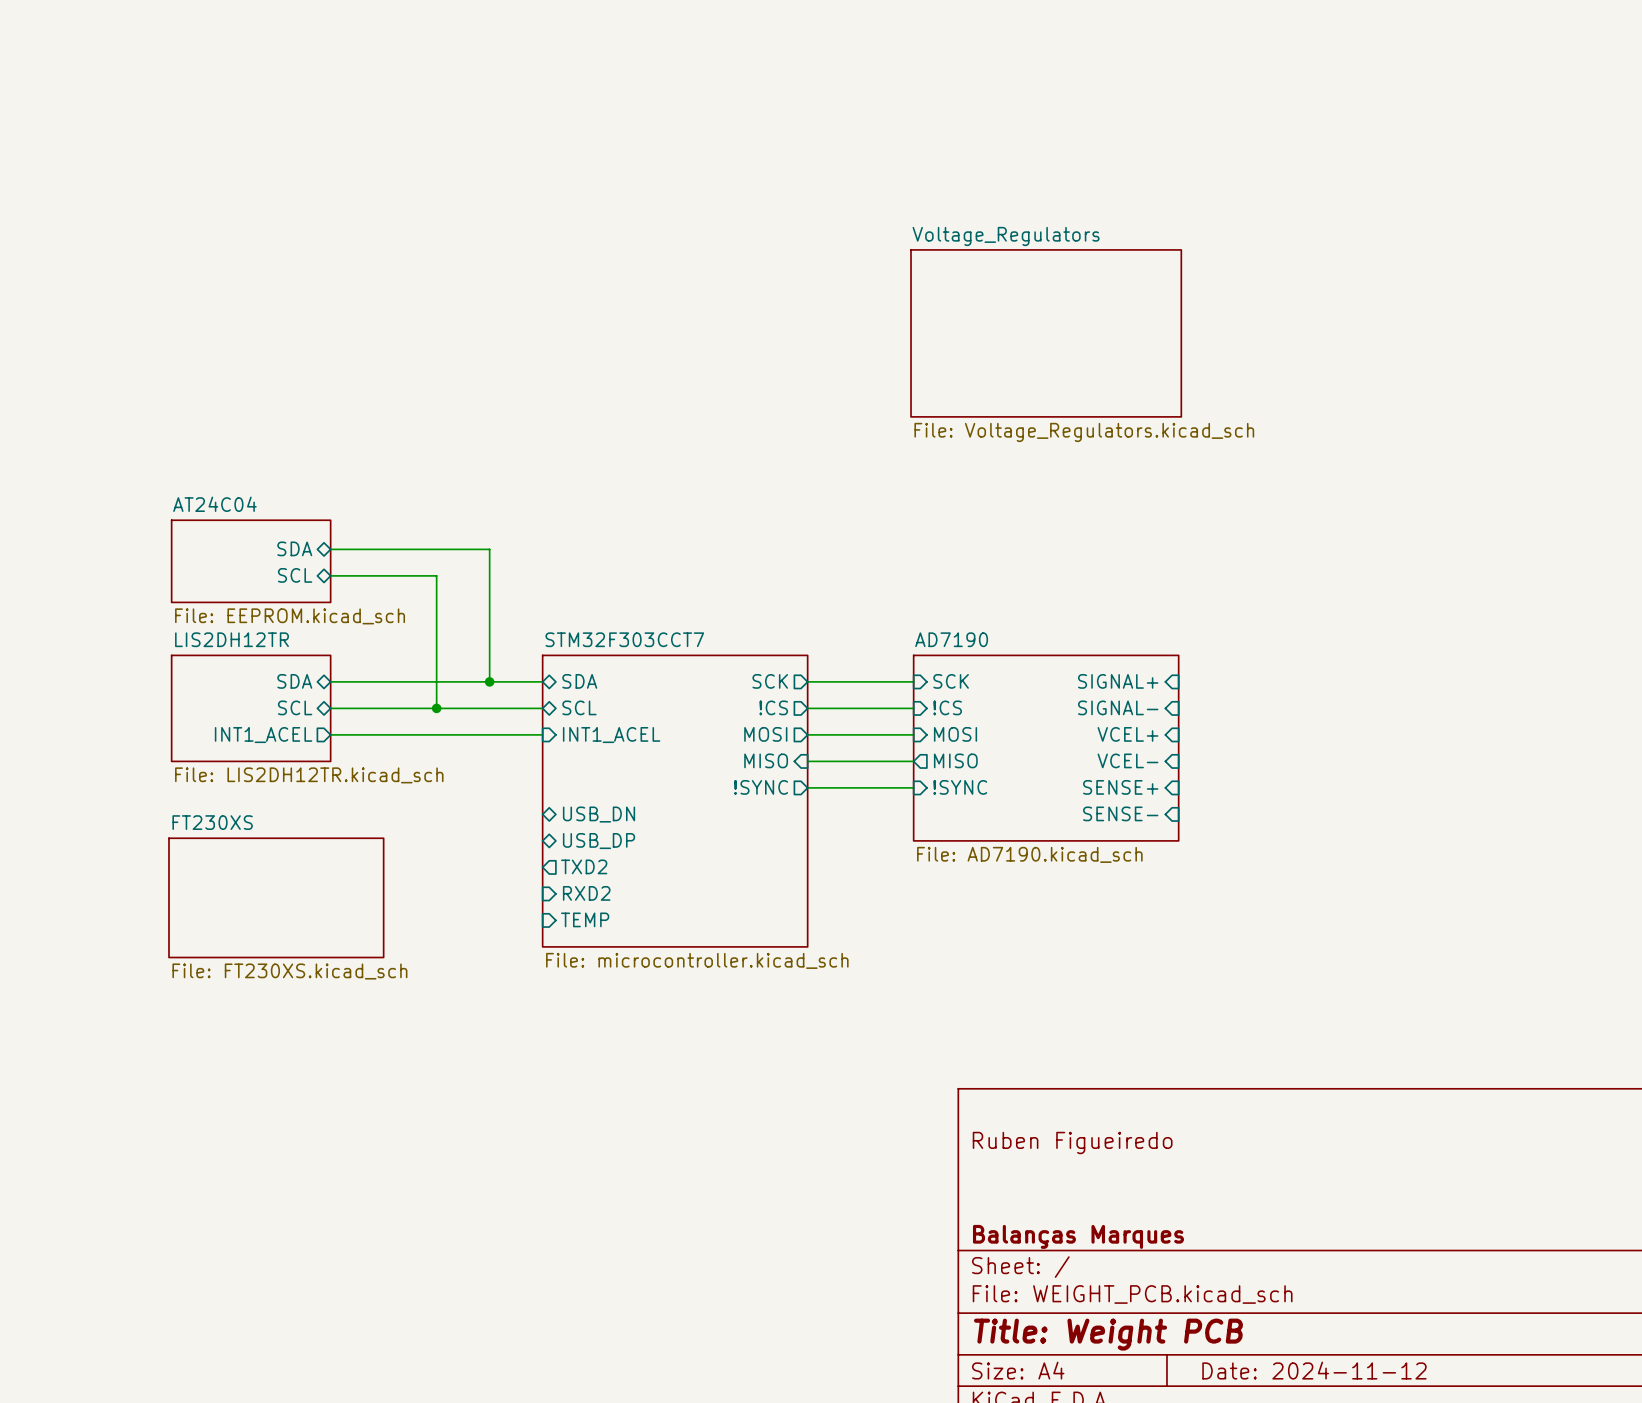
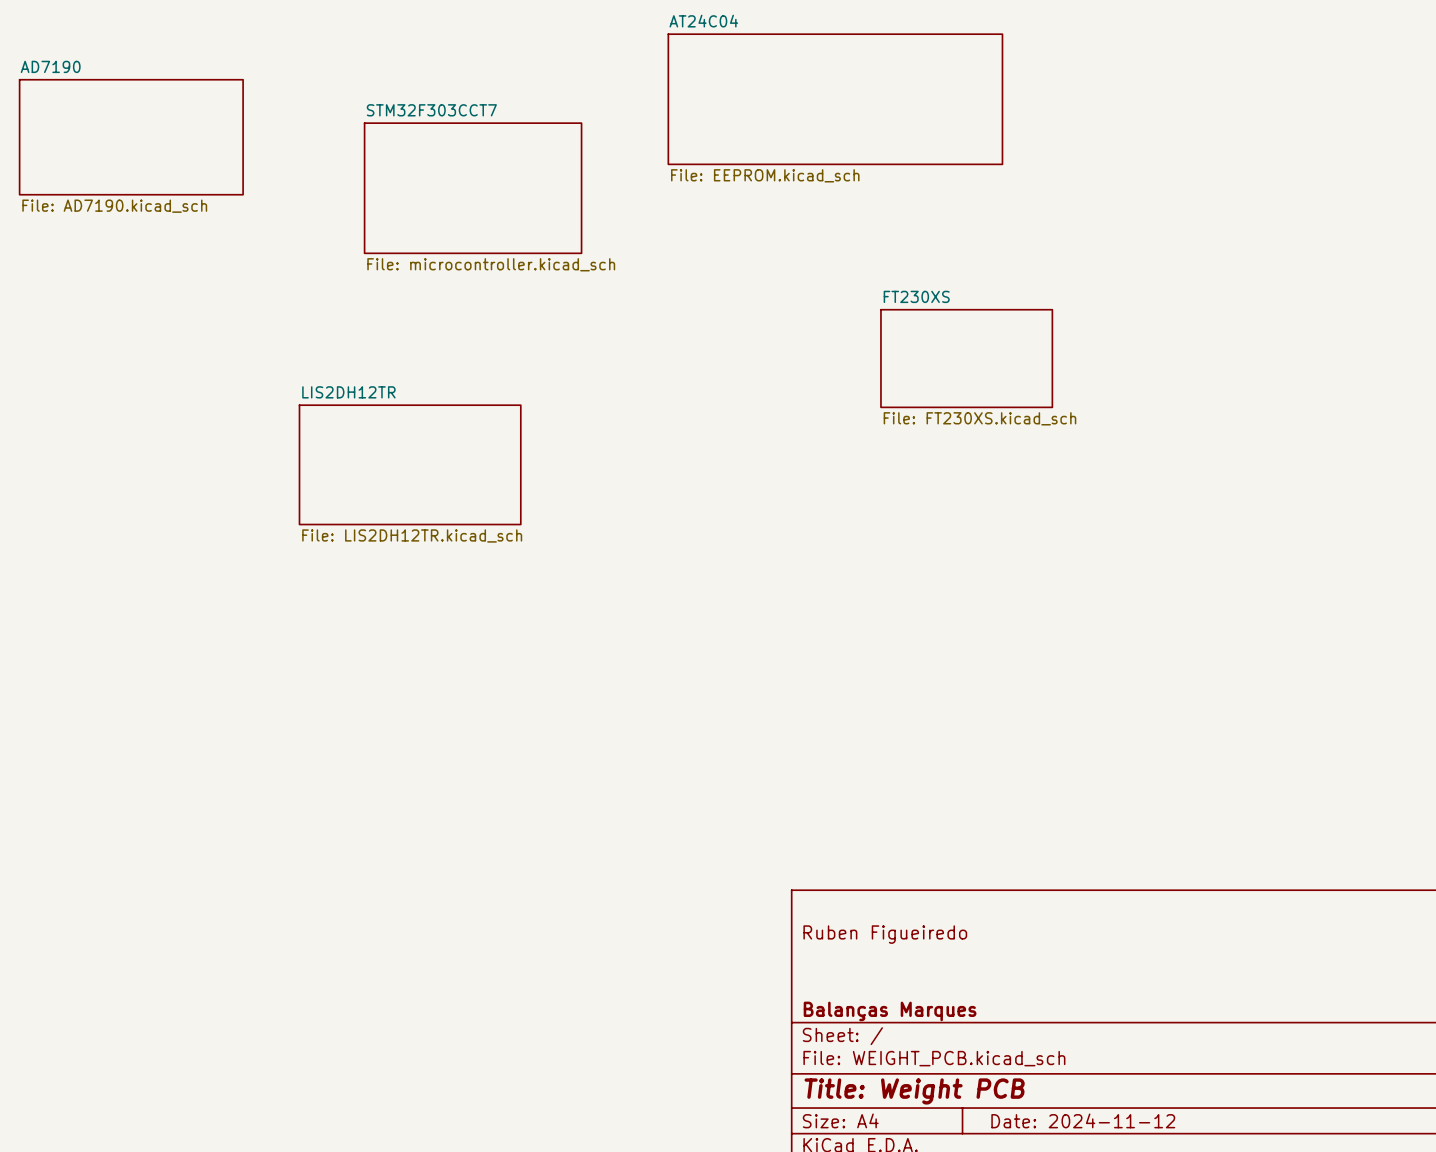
sheet Voltage_Regulators: File: Voltage_Regulators.kicad_sch (1046, 333) -> none
sheet AT24C04 name position: AT24C04 (214, 504) -> AT24C04 (703, 21)
sheet AT24C04 shape: [170, 519, 332, 604] -> [667, 33, 1004, 166]
sheet pin: SDA (294, 548) -> none
wire: (330, 549) (489, 549) (489, 681) -> none
sheet pin: SCL (295, 575) -> none
wire: (330, 575) (436, 575) (436, 708) -> none
sheet AT24C04 value position: File: EEPROM.kicad_sch (290, 616) -> File: EEPROM.kicad_sch (765, 175)
sheet LIS2DH12TR name position: LIS2DH12TR (231, 639) -> LIS2DH12TR (348, 392)
sheet STM32F303CCT7 name position: STM32F303CCT7 (624, 639) -> STM32F303CCT7 (431, 110)
sheet AD7190 name position: AD7190 (951, 639) -> AD7190 (50, 66)
sheet LIS2DH12TR shape: [170, 654, 332, 763] -> [298, 404, 522, 526]
sheet STM32F303CCT7 shape: [541, 654, 809, 948] -> [363, 122, 583, 254]
sheet AD7190 shape: [912, 654, 1180, 842] -> [18, 79, 244, 196]
sheet pin: SDA (294, 681) -> none
wire: (330, 681) (542, 681) -> none
junction: (489, 681) -> none
sheet pin: SDA (579, 681) -> none
sheet pin: SCK (770, 681) -> none
wire: (807, 681) (913, 681) -> none
sheet pin: SCK (951, 681) -> none
sheet pin: SIGNAL+ (1118, 681) -> none
sheet pin: SCL (295, 707) -> none
sheet pin: SCL (579, 707) -> none
sheet pin: !CS (773, 707) -> none
sheet pin: !CS (947, 707) -> none
sheet pin: SIGNAL- (1118, 707) -> none
wire: (330, 708) (542, 708) -> none
junction: (436, 708) -> none
wire: (807, 708) (913, 708) -> none
wire: (330, 734) (542, 734) -> none
sheet pin: MOSI (765, 734) -> none
wire: (807, 734) (913, 734) -> none
sheet pin: MOSI (955, 734) -> none
sheet pin: VCEL+ (1127, 734) -> none
sheet pin: INT1_ACEL (263, 735) -> none
sheet pin: INT1_ACEL (611, 735) -> none
sheet pin: MISO (766, 760) -> none
sheet pin: MISO (955, 760) -> none
sheet pin: VCEL- (1127, 760) -> none
wire: (807, 761) (913, 761) -> none
sheet LIS2DH12TR value position: File: LIS2DH12TR.kicad_sch (309, 775) -> File: LIS2DH12TR.kicad_sch (412, 535)
sheet pin: !SYNC (761, 787) -> none
wire: (807, 787) (913, 787) -> none
sheet pin: !SYNC (960, 787) -> none
sheet pin: SENSE+ (1120, 787) -> none
sheet pin: SENSE- (1120, 813) -> none
sheet pin: USB_DN (599, 814) -> none
sheet FT230XS shape: [168, 837, 385, 959] -> [880, 309, 1054, 409]
sheet pin: USB_DP (599, 841) -> none
sheet AD7190 value position: File: AD7190.kicad_sch (1029, 854) -> File: AD7190.kicad_sch (114, 206)
sheet pin: TXD2 (584, 866) -> none
sheet pin: RXD2 (586, 893) -> none
sheet pin: TEMP (585, 919) -> none
sheet STM32F303CCT7 value position: File: microcontroller.kicad_sch (697, 960) -> File: microcontroller.kicad_sch (491, 264)

